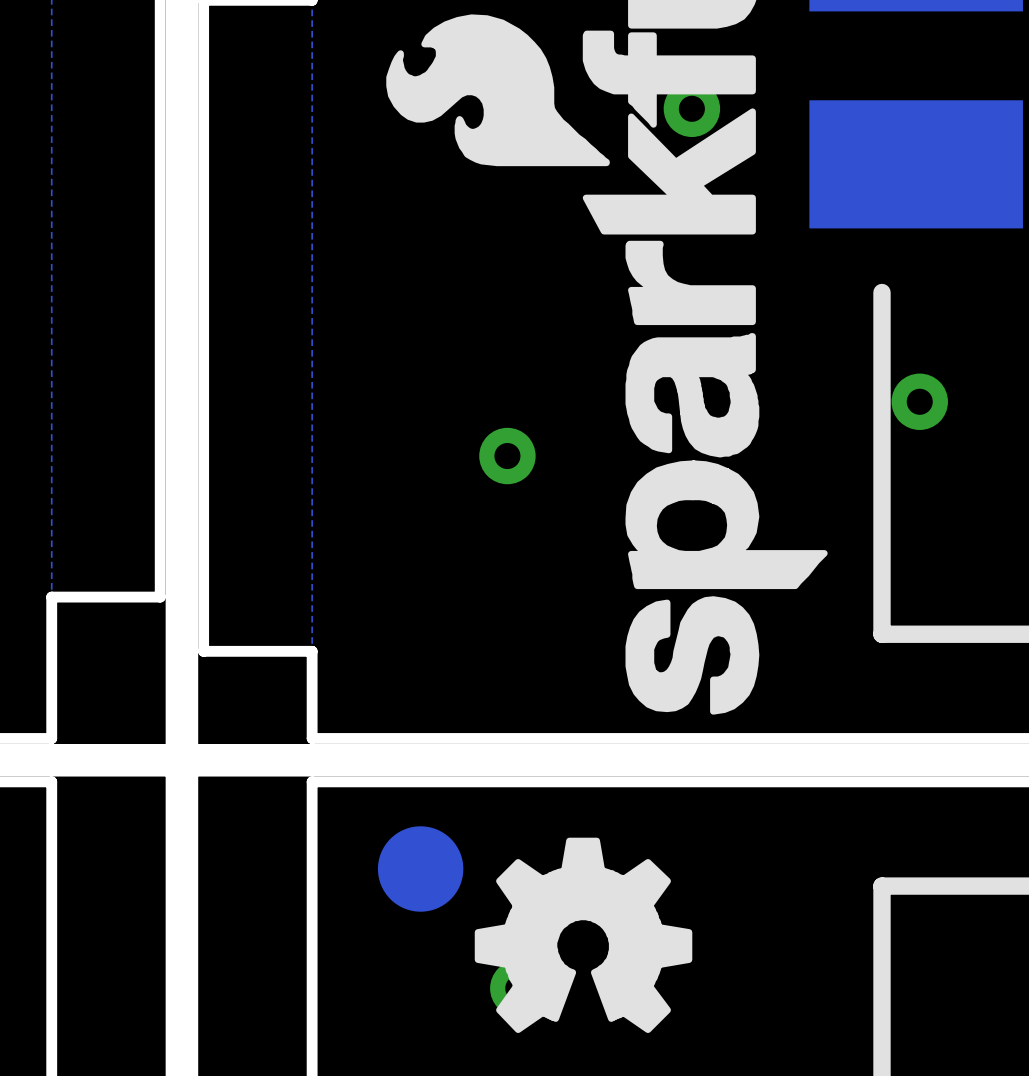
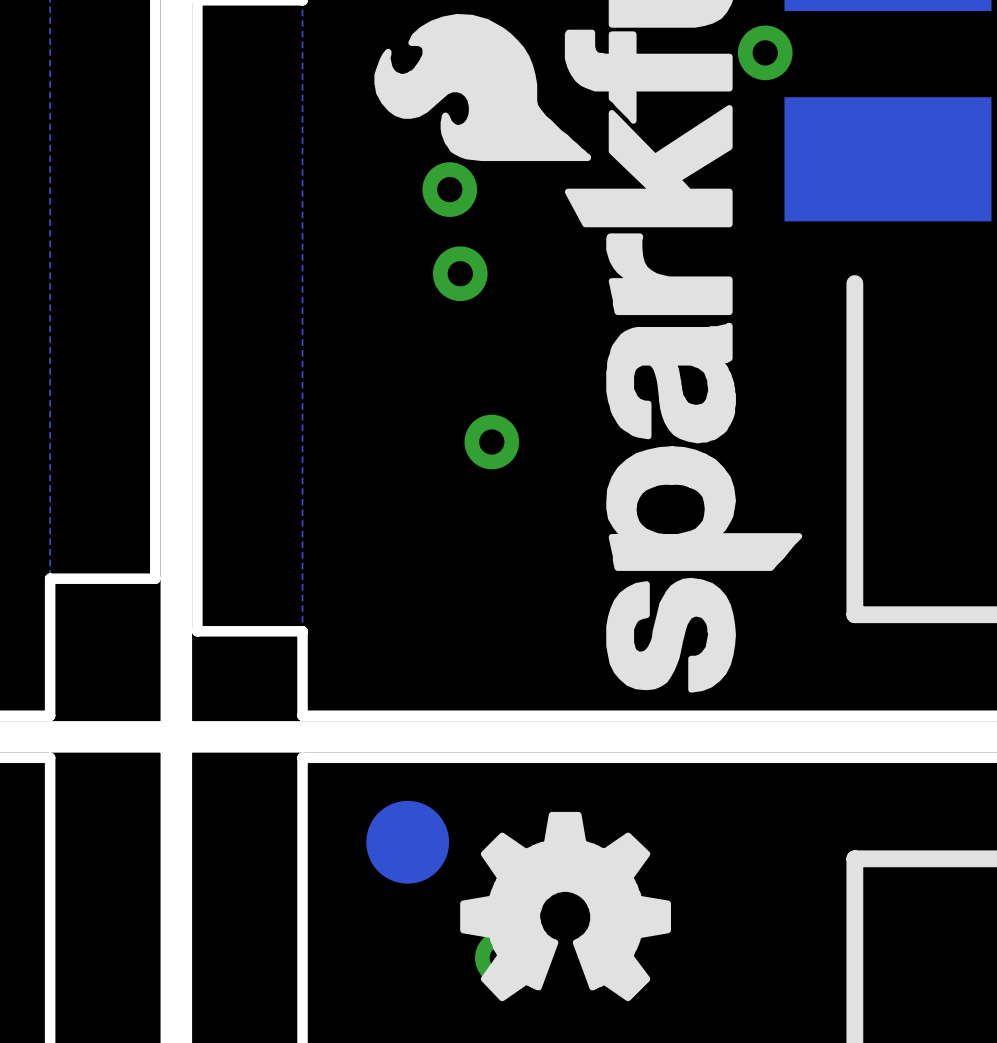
via position: (691, 108) -> (765, 52)
via: none -> (449, 189)
via: none -> (460, 273)
via: (919, 401) -> none

